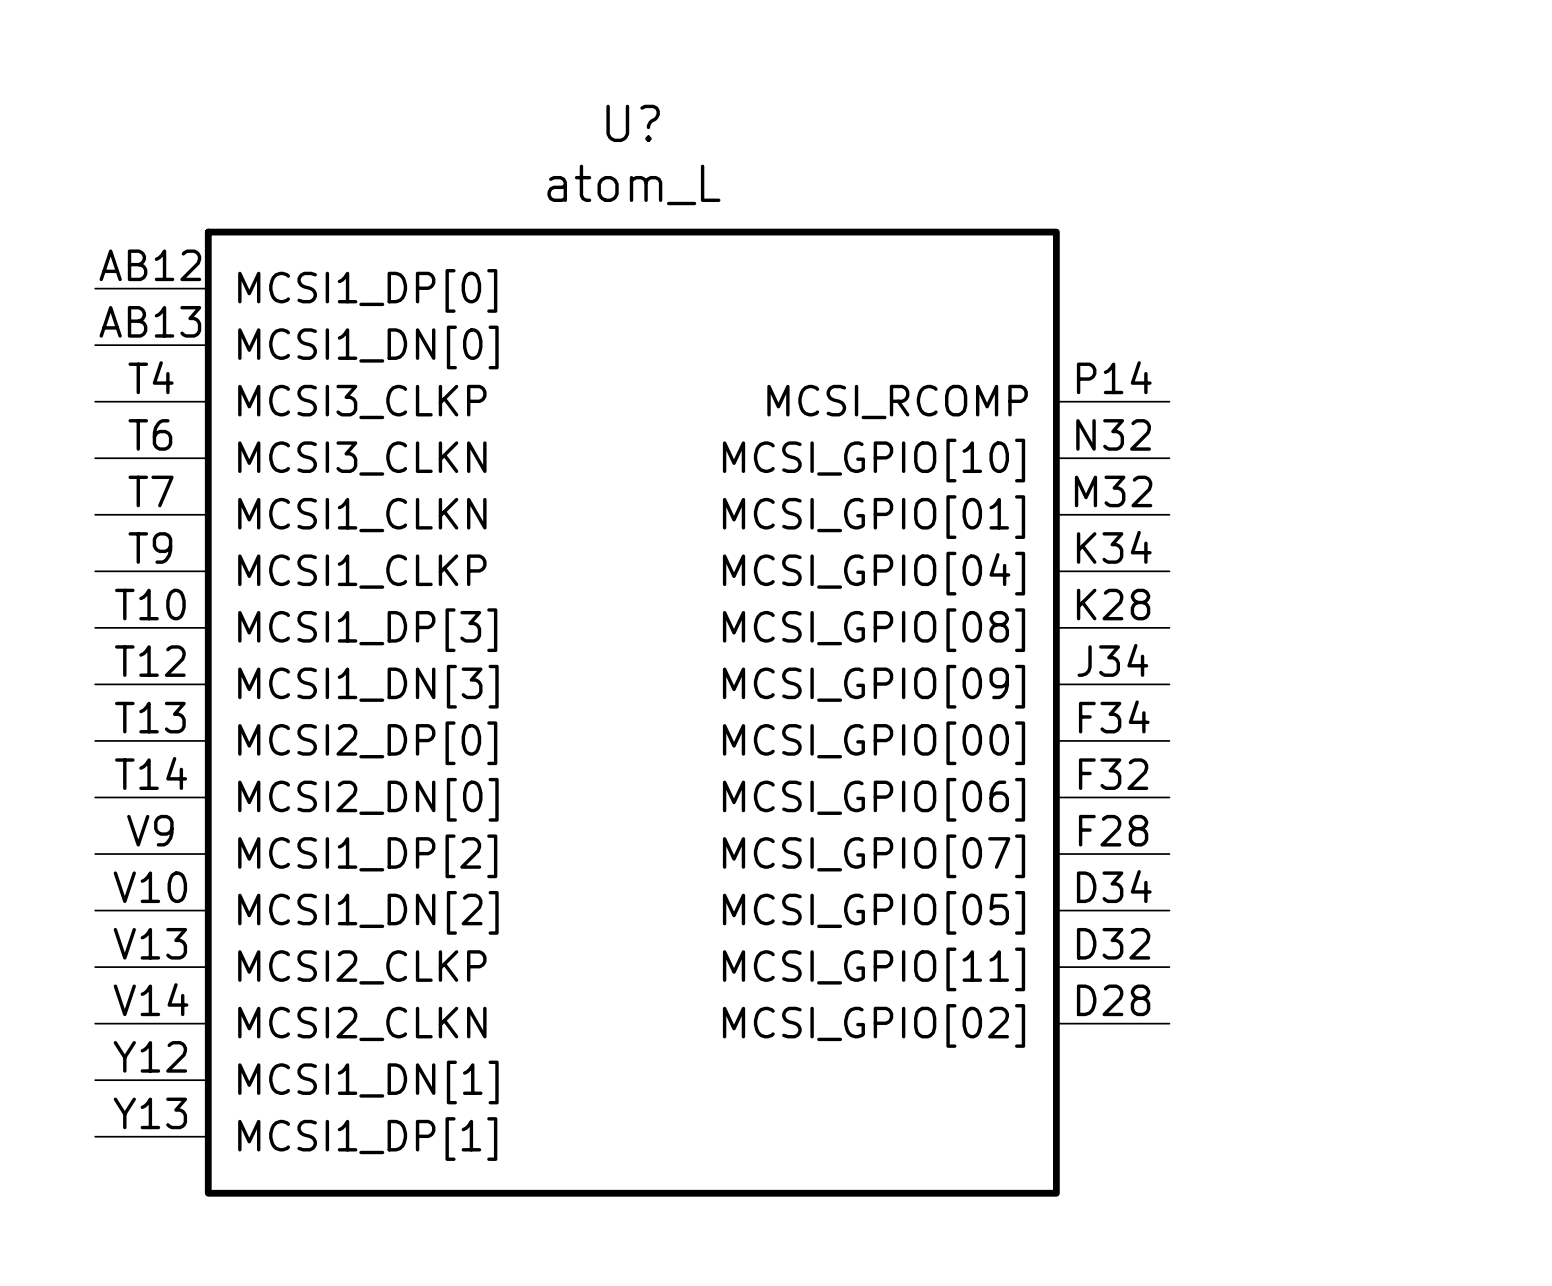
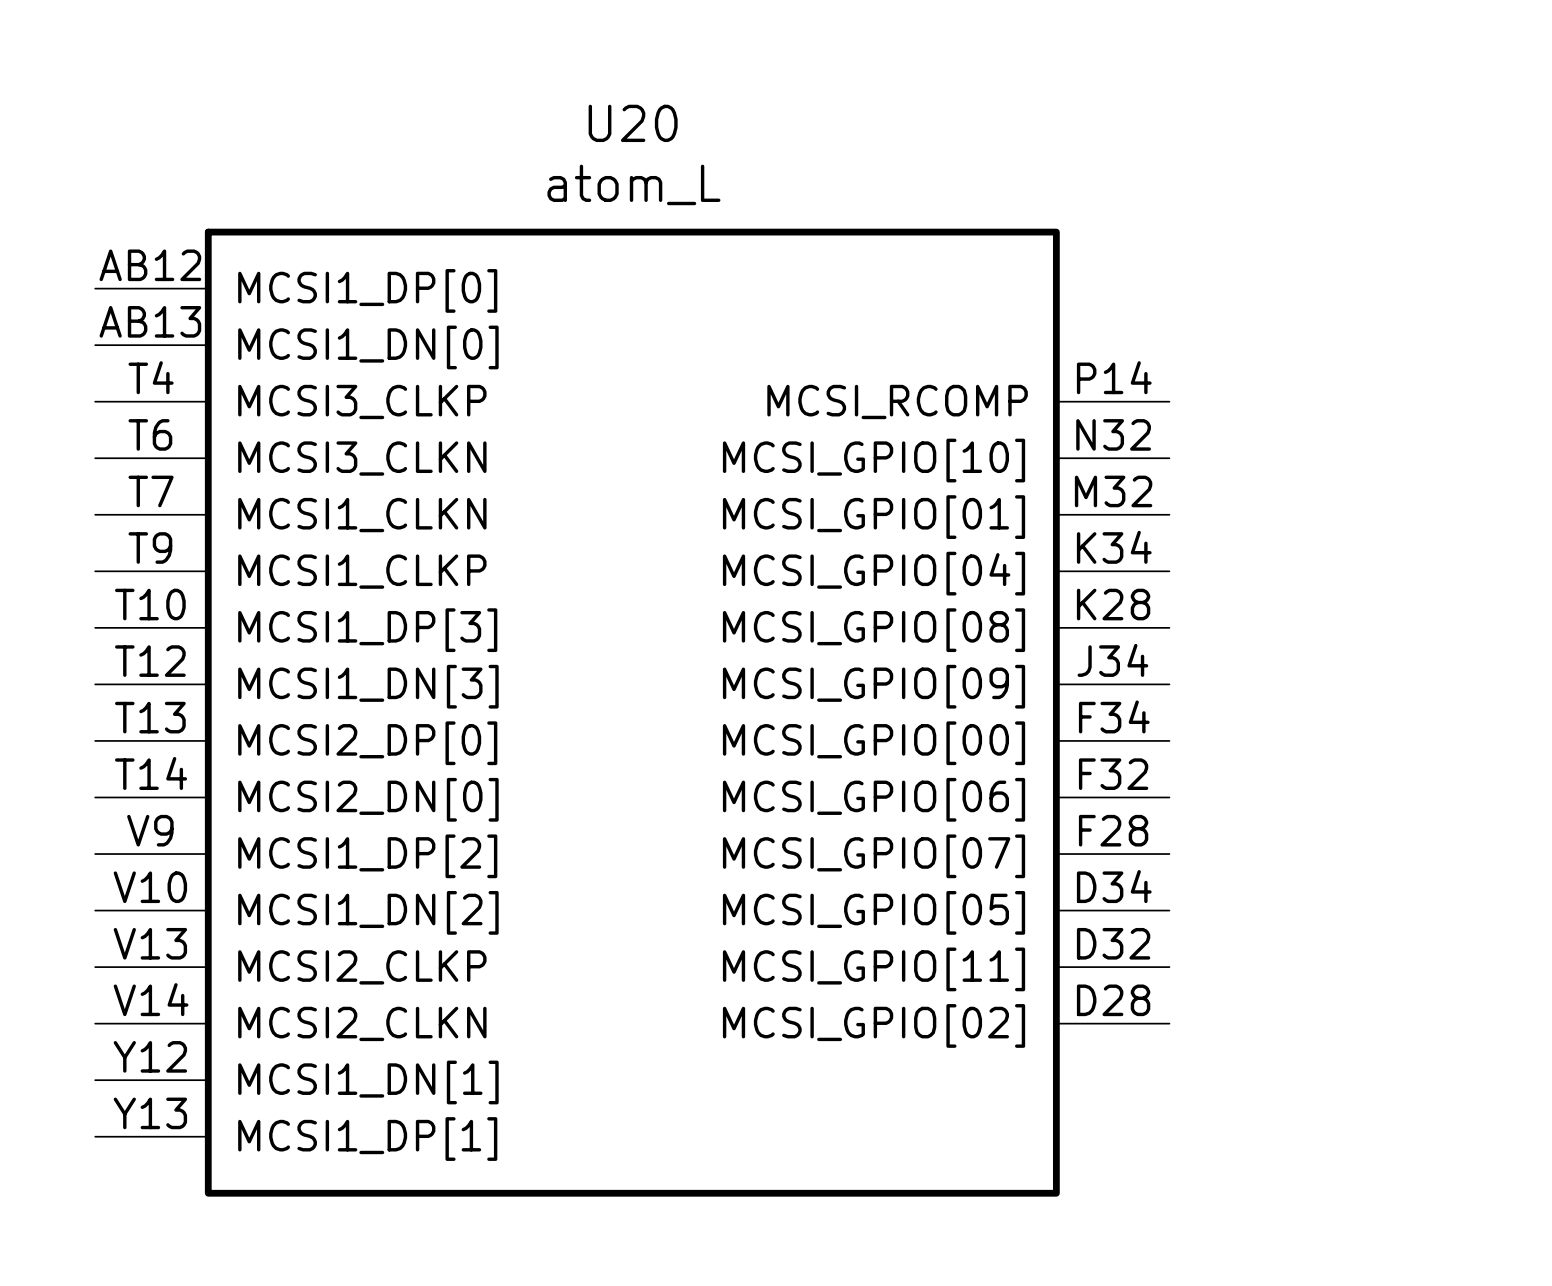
U? name: U? (633, 123) -> U20 (633, 123)

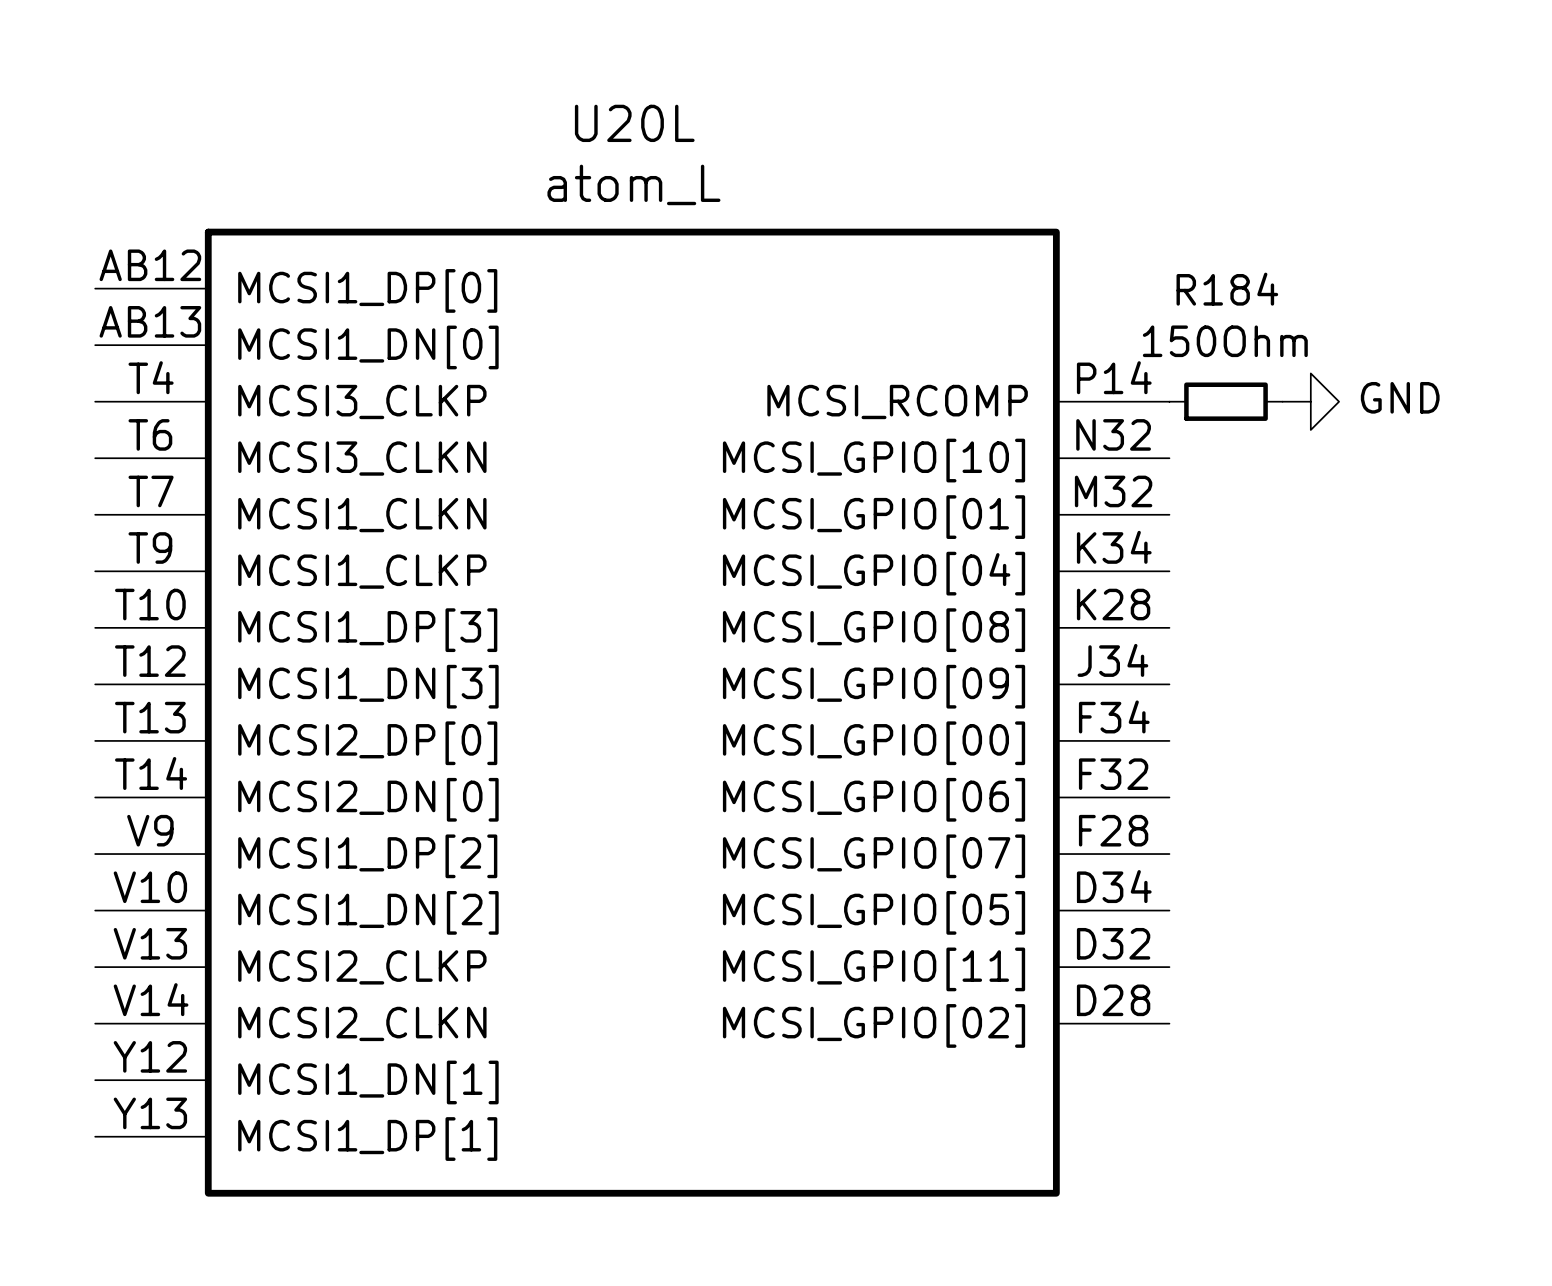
U20 name: U20 (633, 123) -> U20L (634, 123)
R184: none -> 150Ohm (1225, 401)
power symbol: none -> GND (1310, 401)

